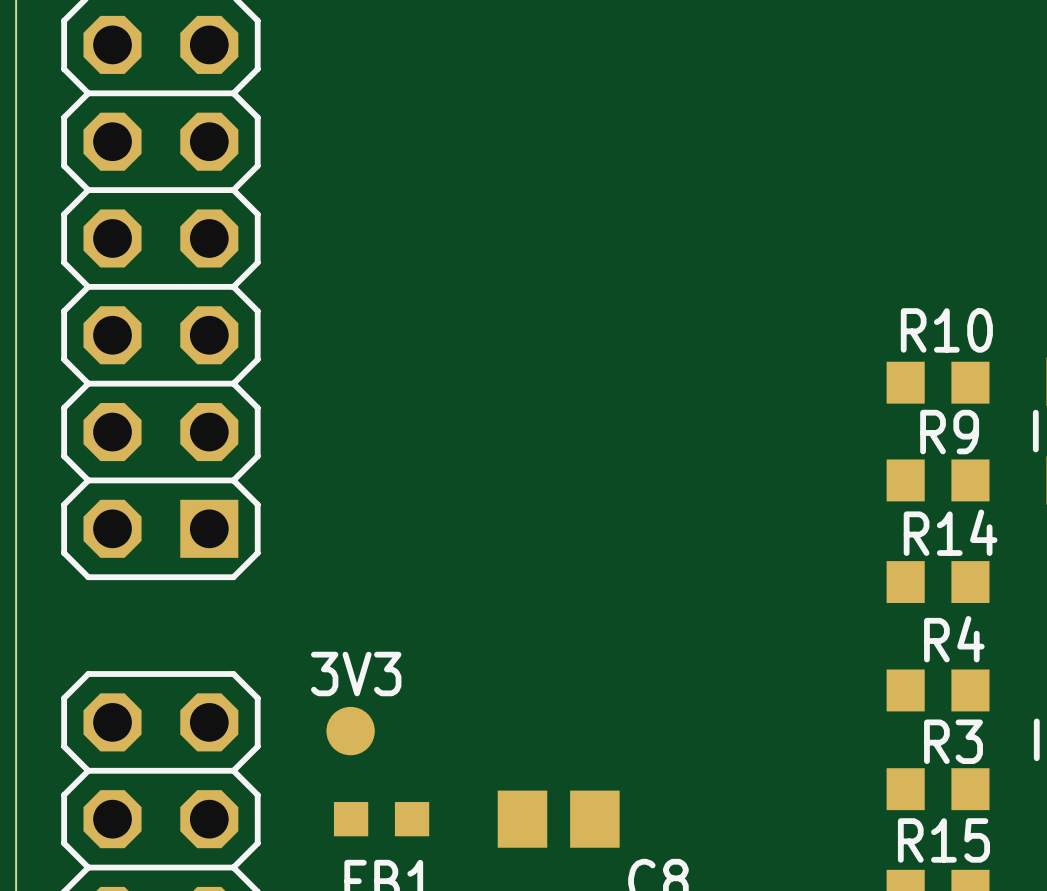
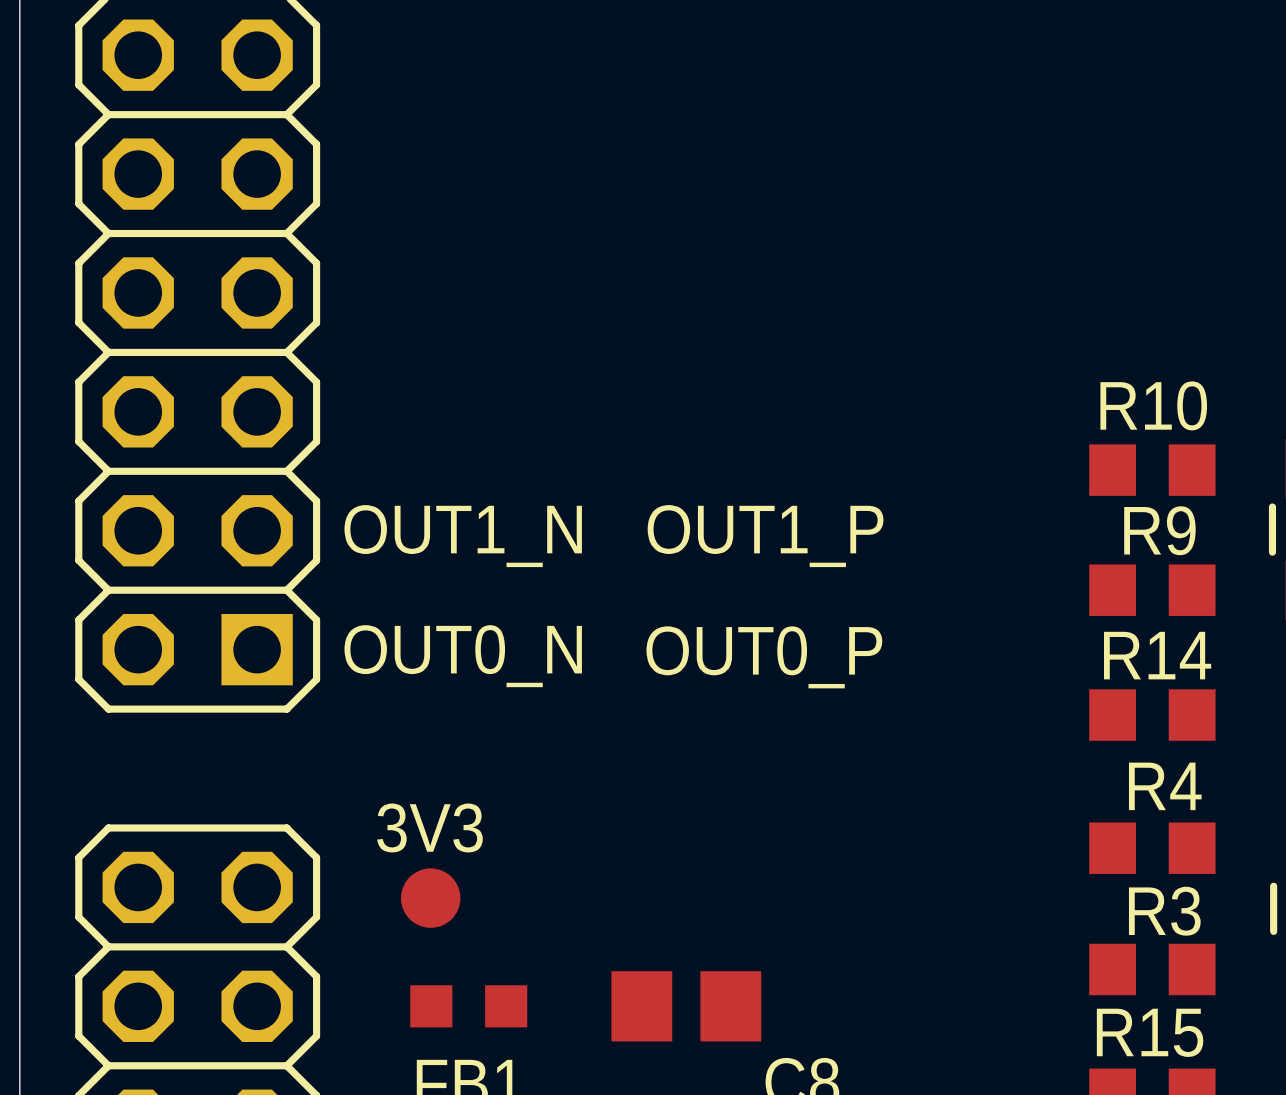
text: none -> OUT1_N (463, 536)
text: none -> OUT1_P (765, 536)
text: none -> OUT0_N (463, 656)
text: none -> OUT0_P (764, 657)

